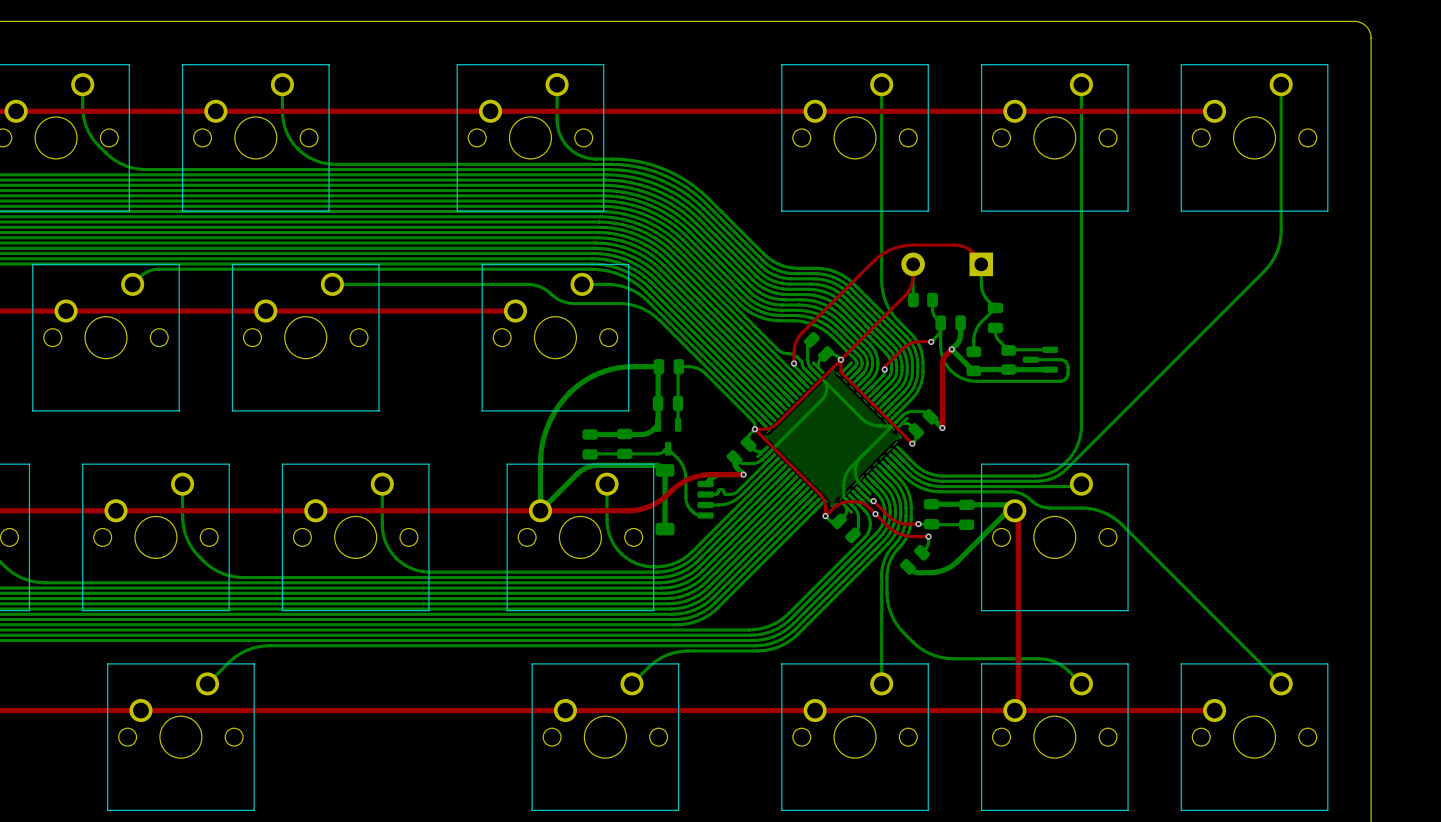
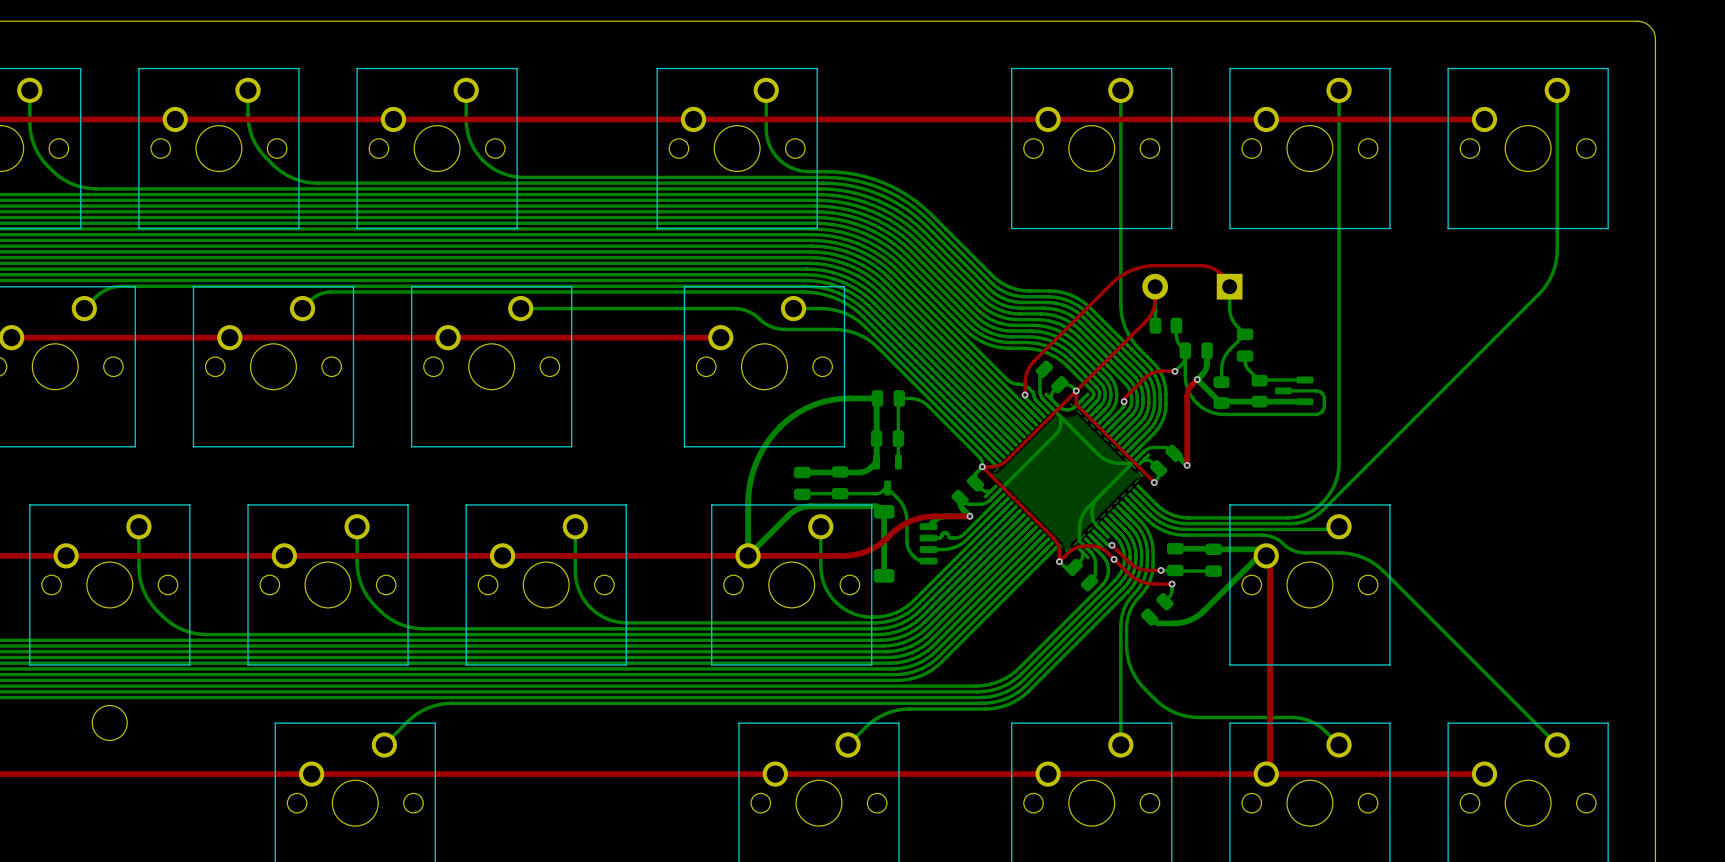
bottom track: none -> (1051, 399) (1060, 408) (1067, 409) (1074, 407) (1082, 399)

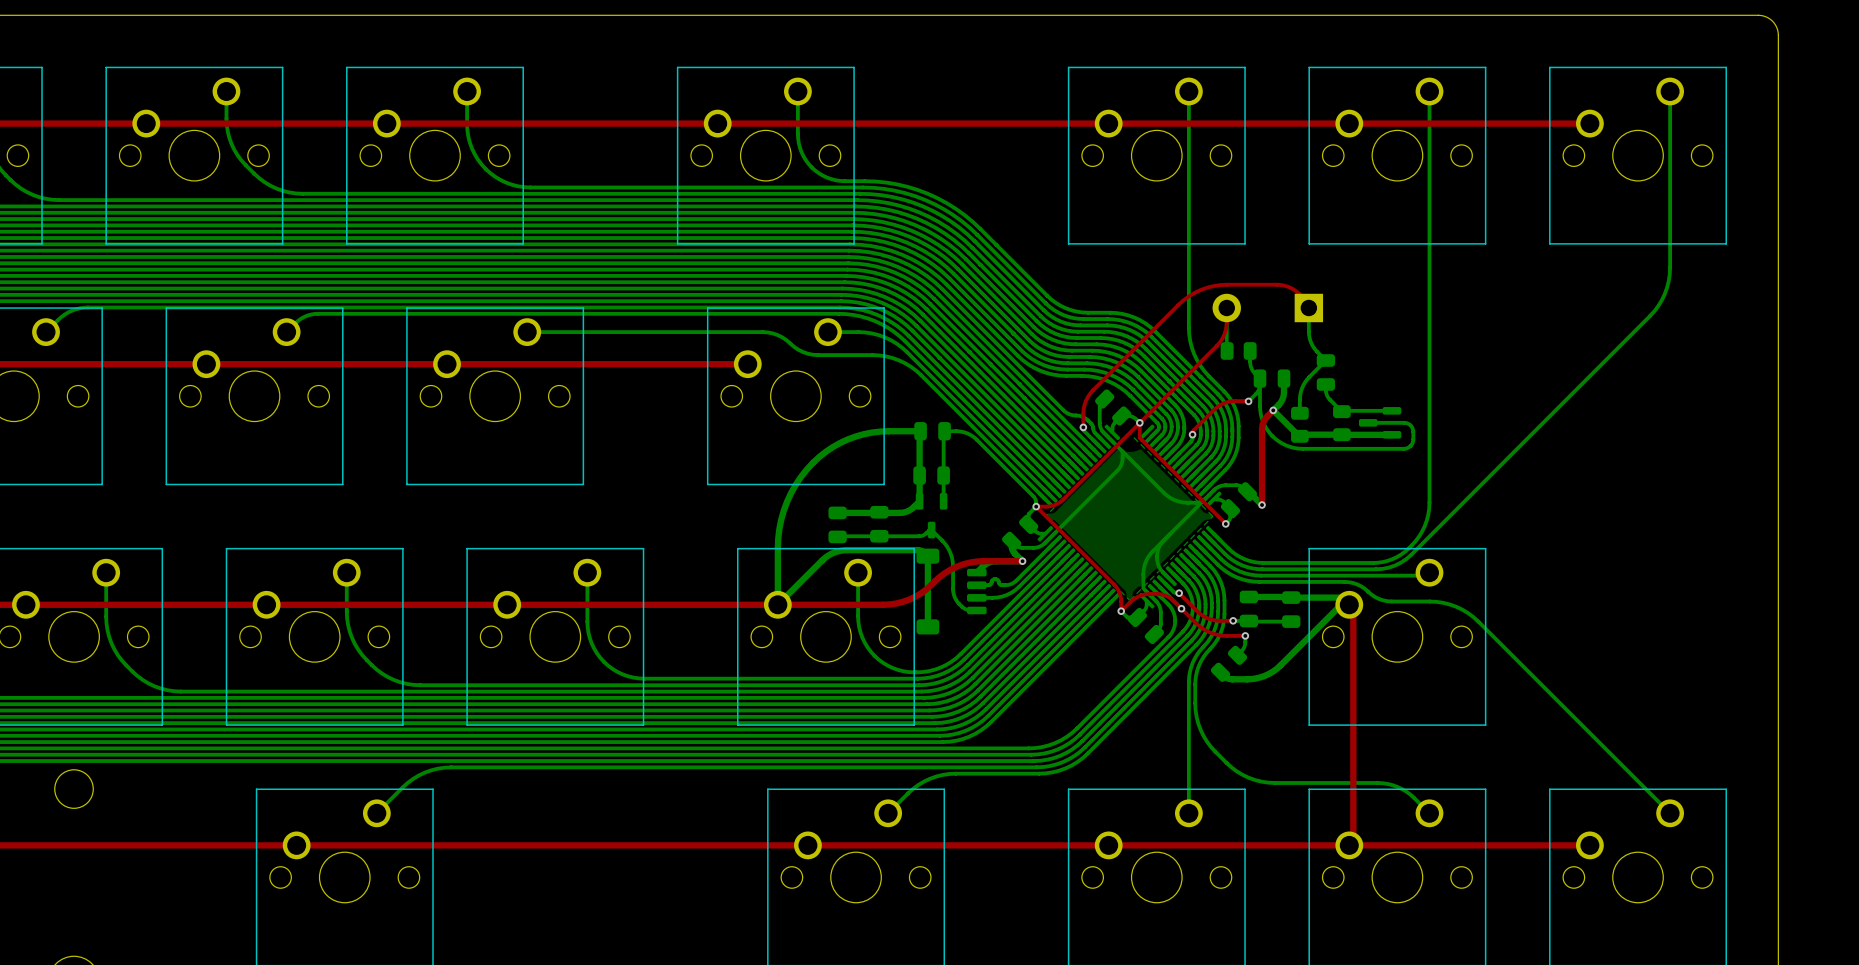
bottom track: (1051, 399) (1060, 408) (1067, 409) (1074, 407) (1082, 399) -> none

